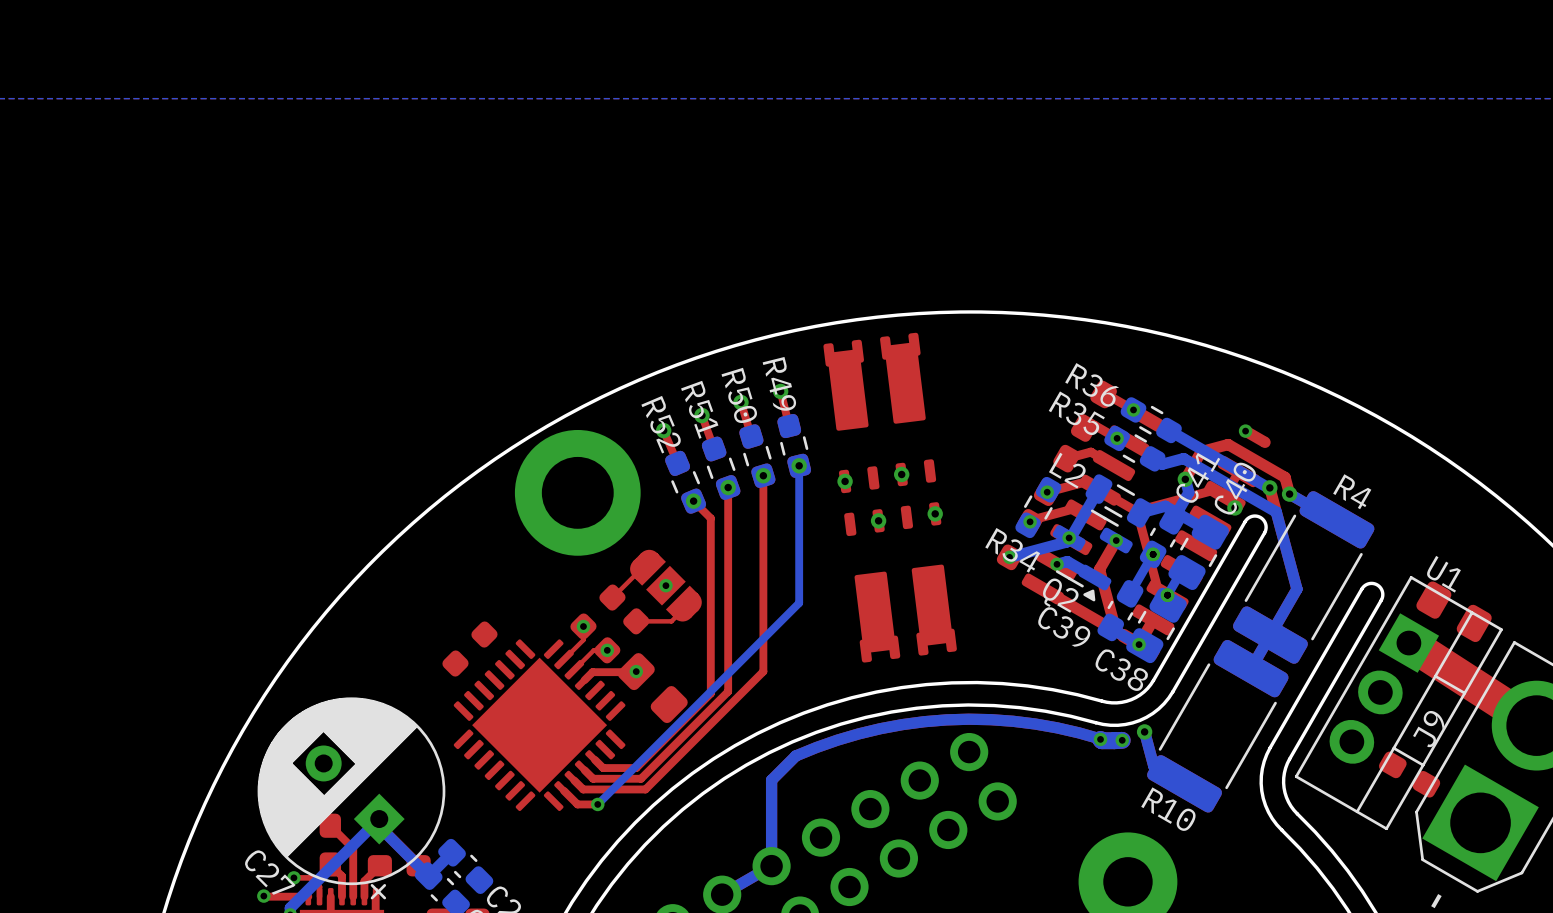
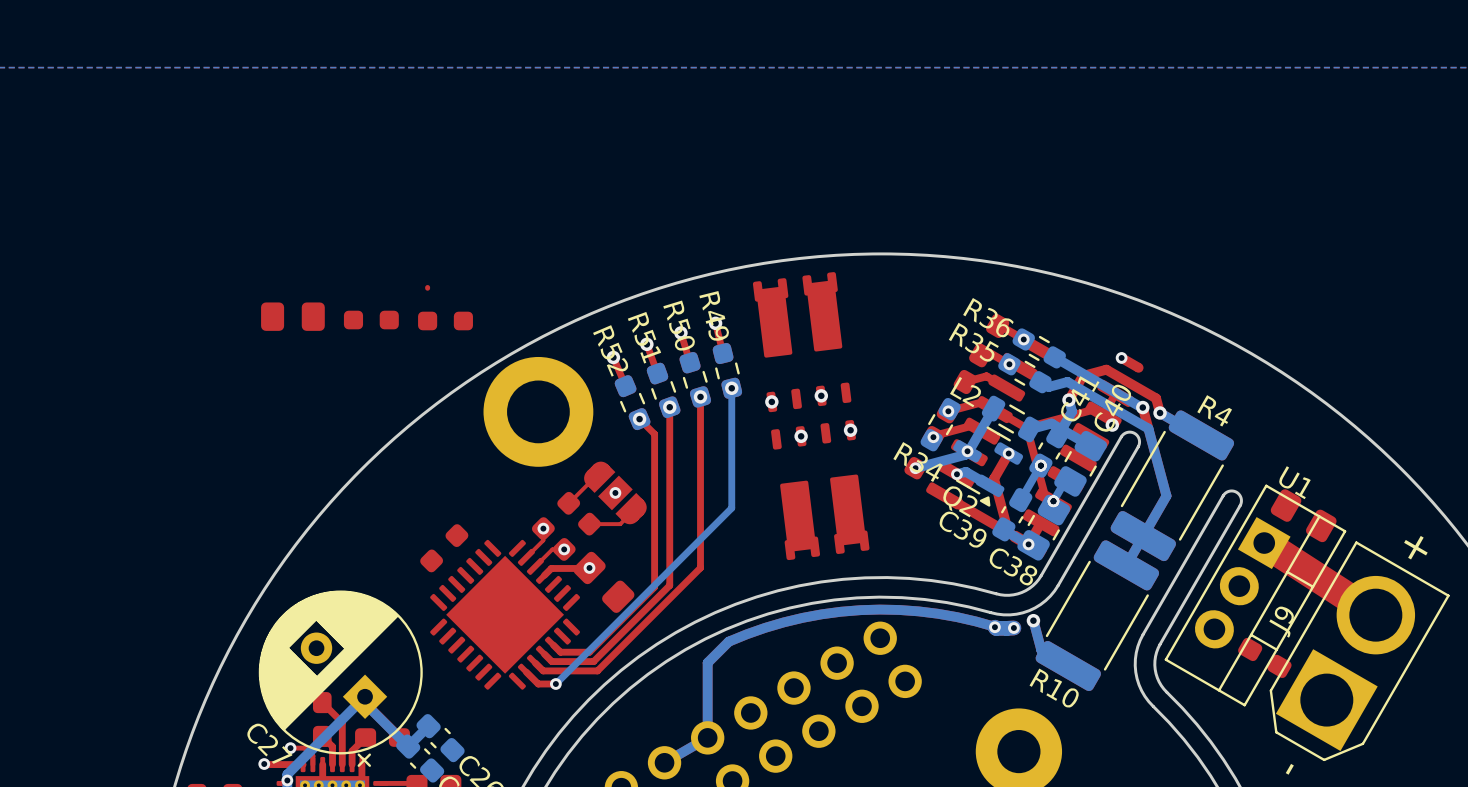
top track: none -> (427, 287) (427, 288)
part: none -> (292, 316)
part: none -> (371, 320)
part: none -> (445, 320)

